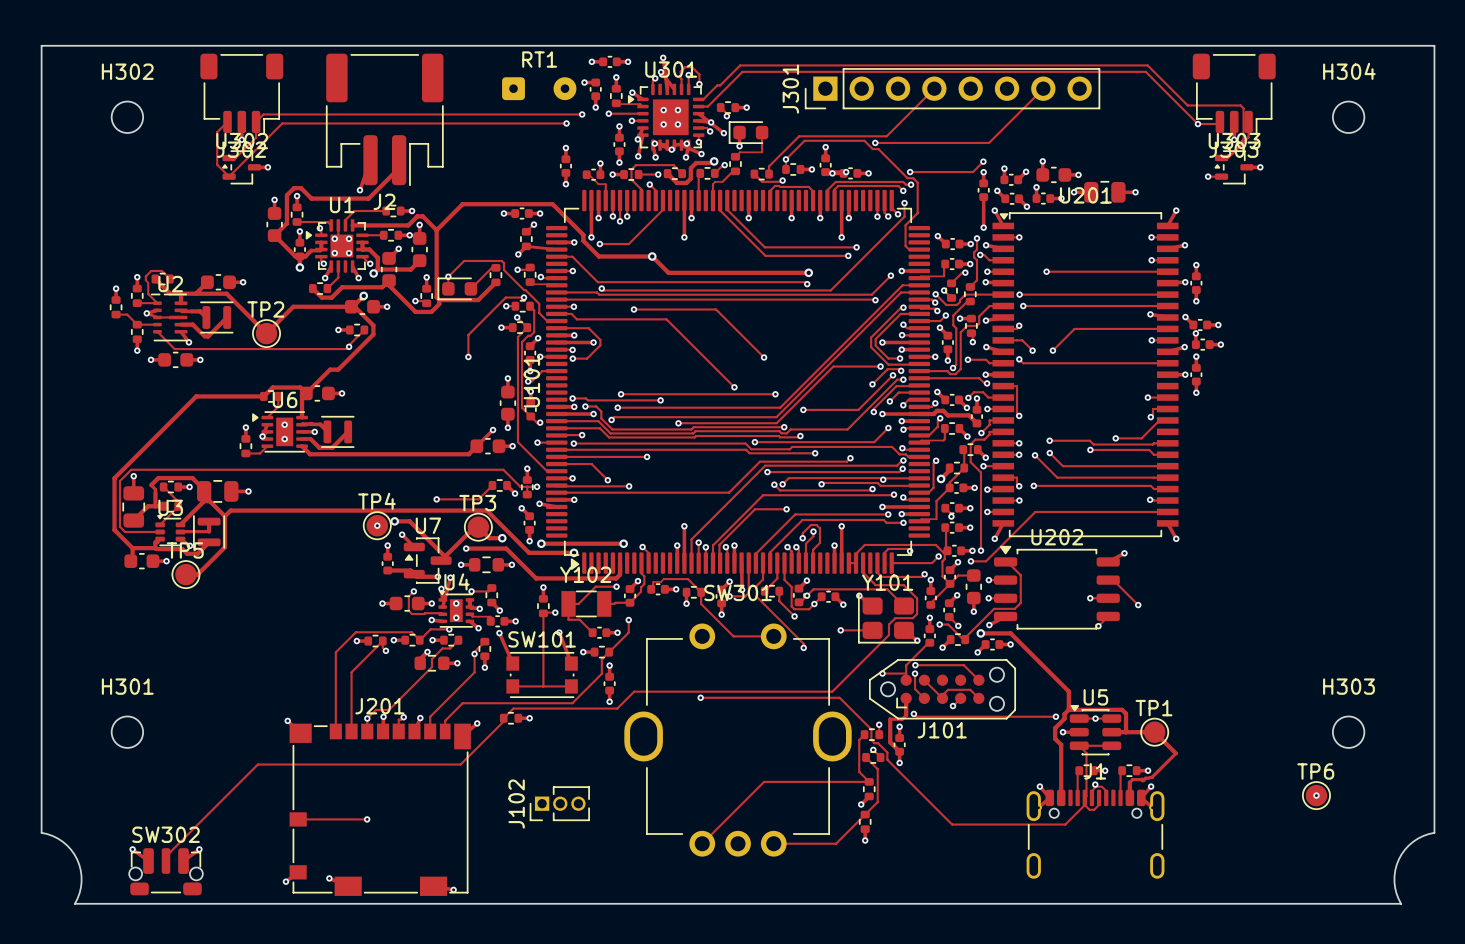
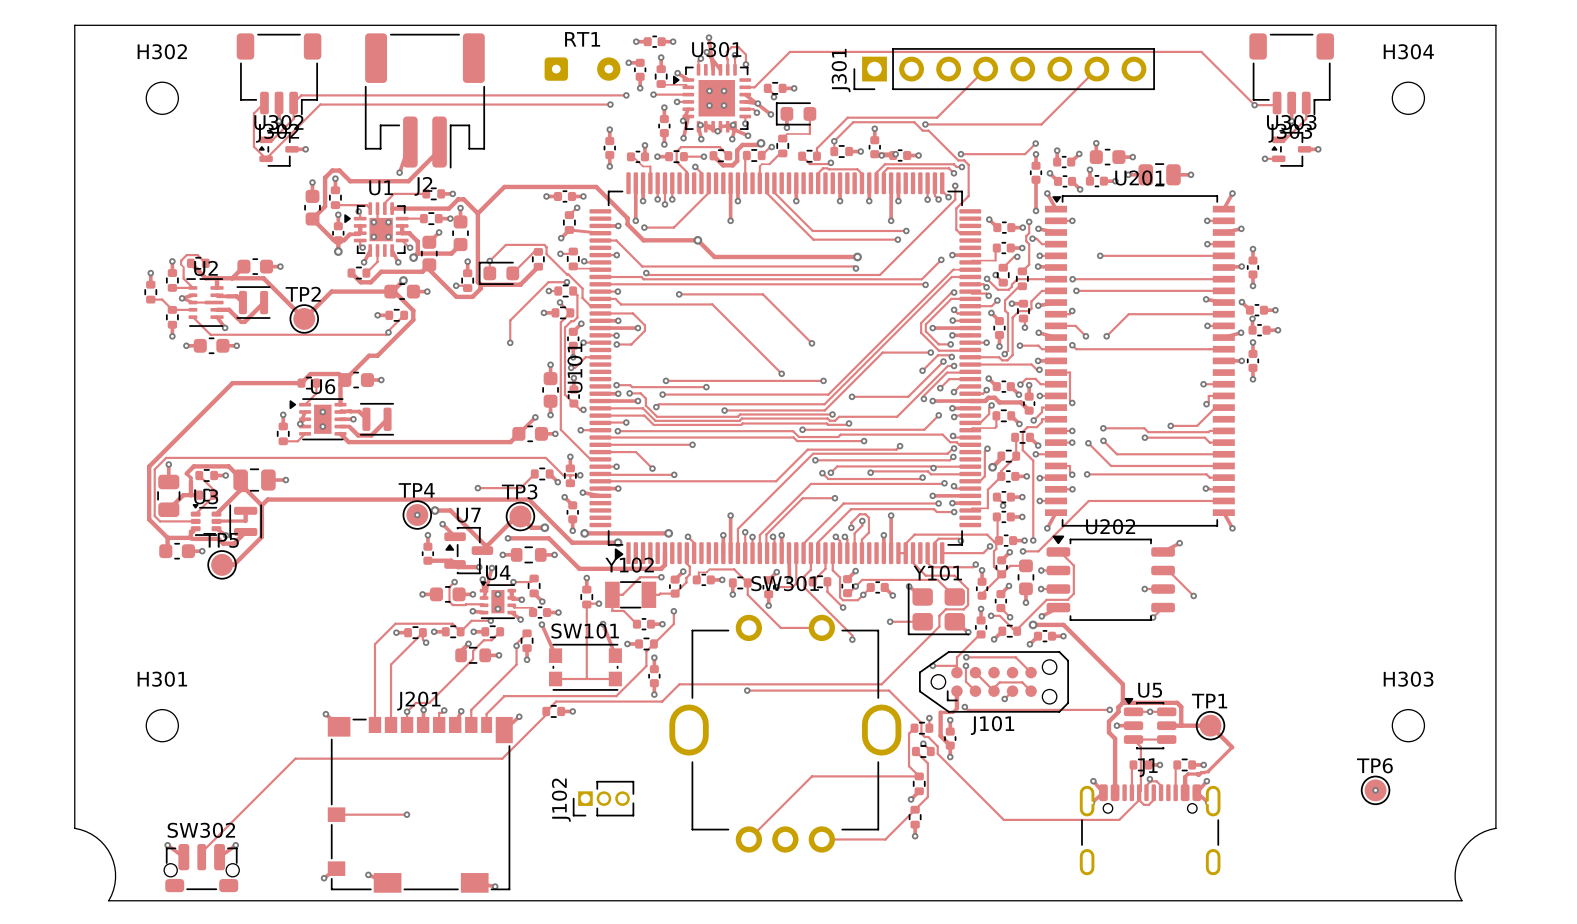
track: (698, 99) (702, 99) (740, 65) (1147, 65) (1187, 105) (1240, 105) (1243, 108) (1242, 144) -> none

